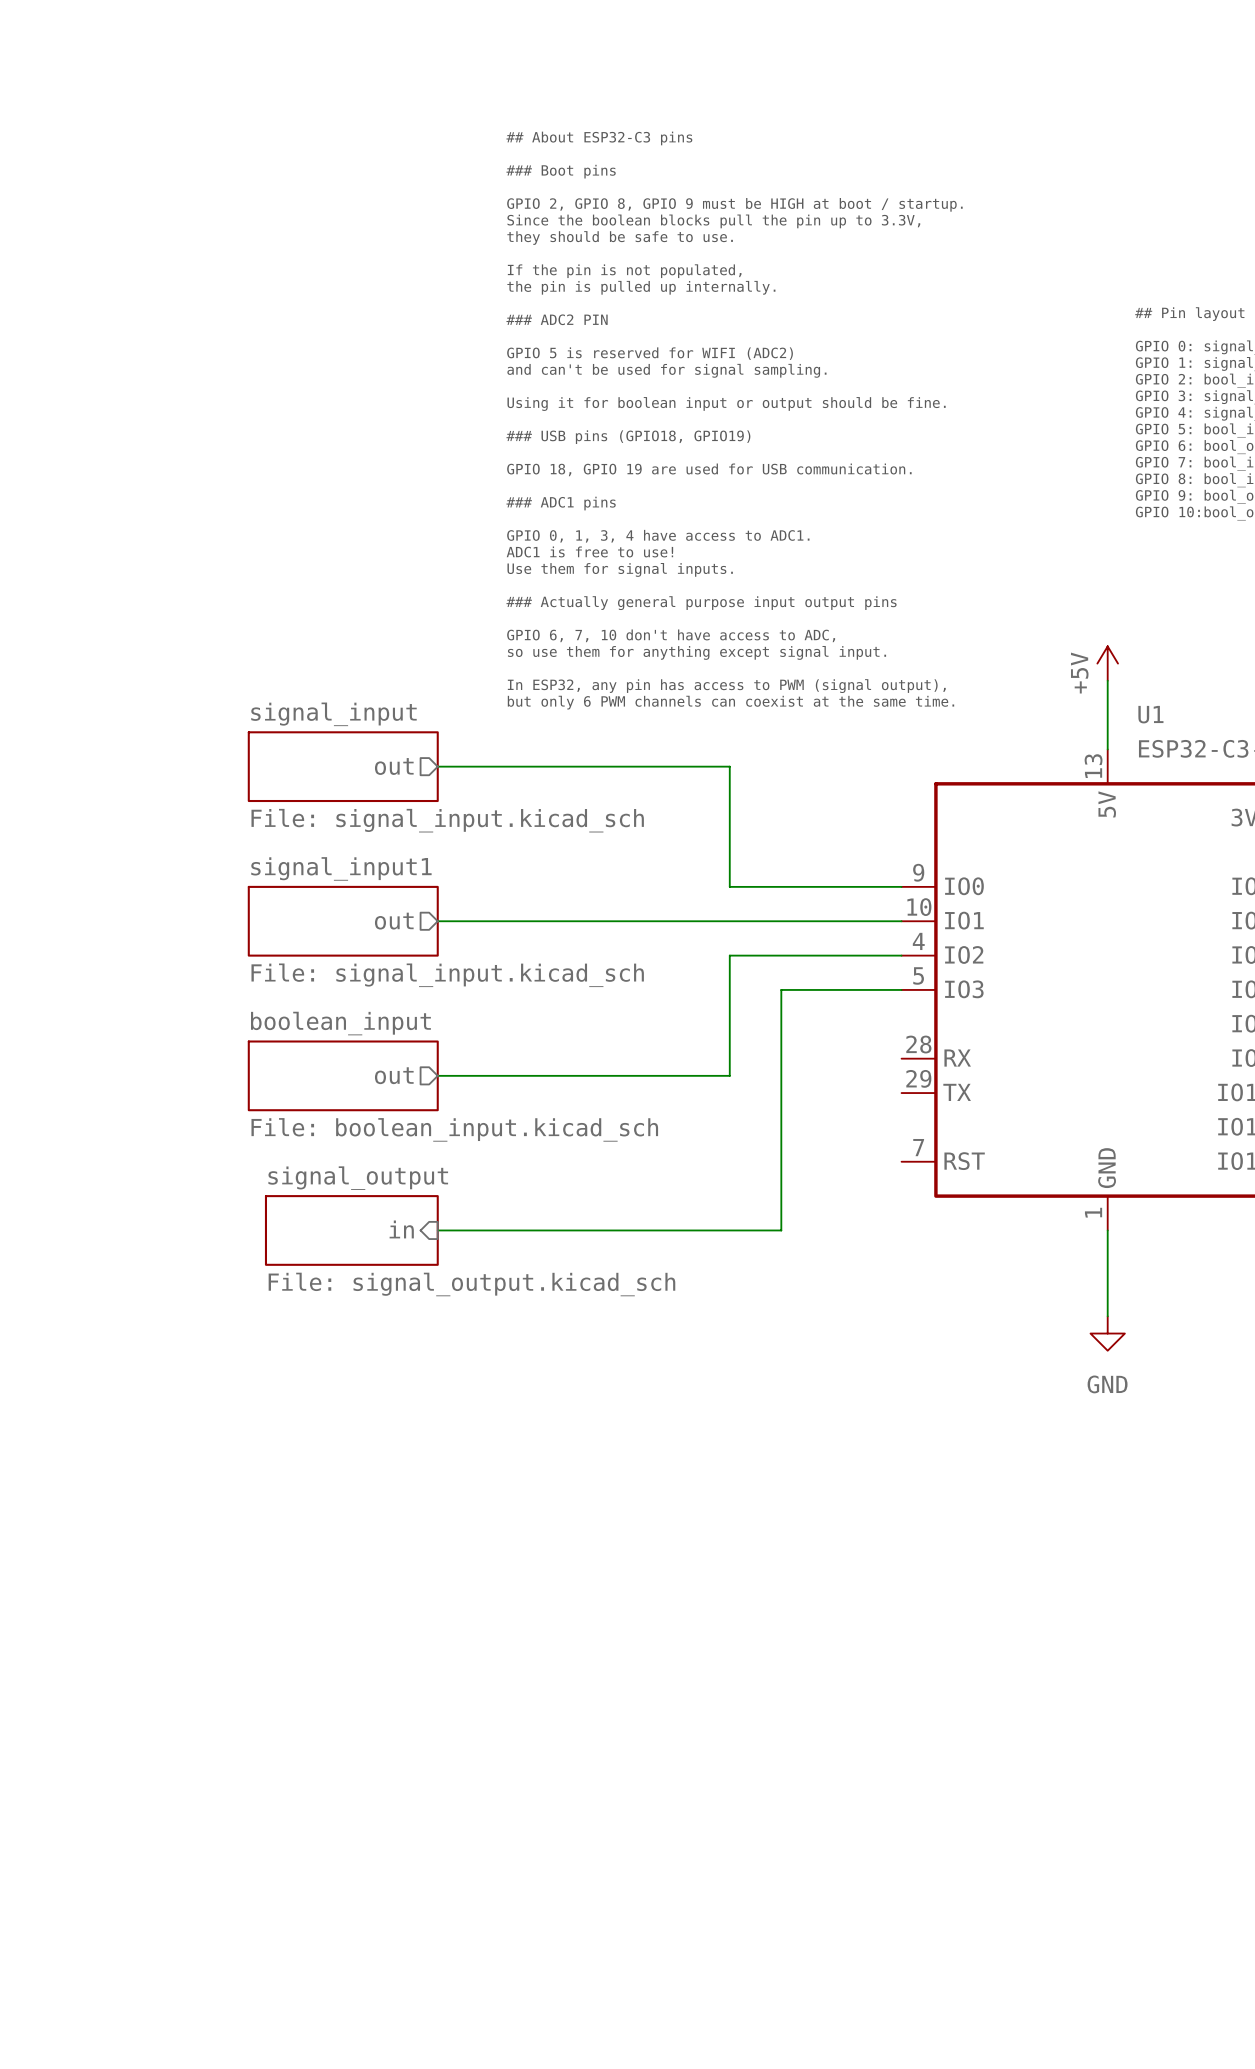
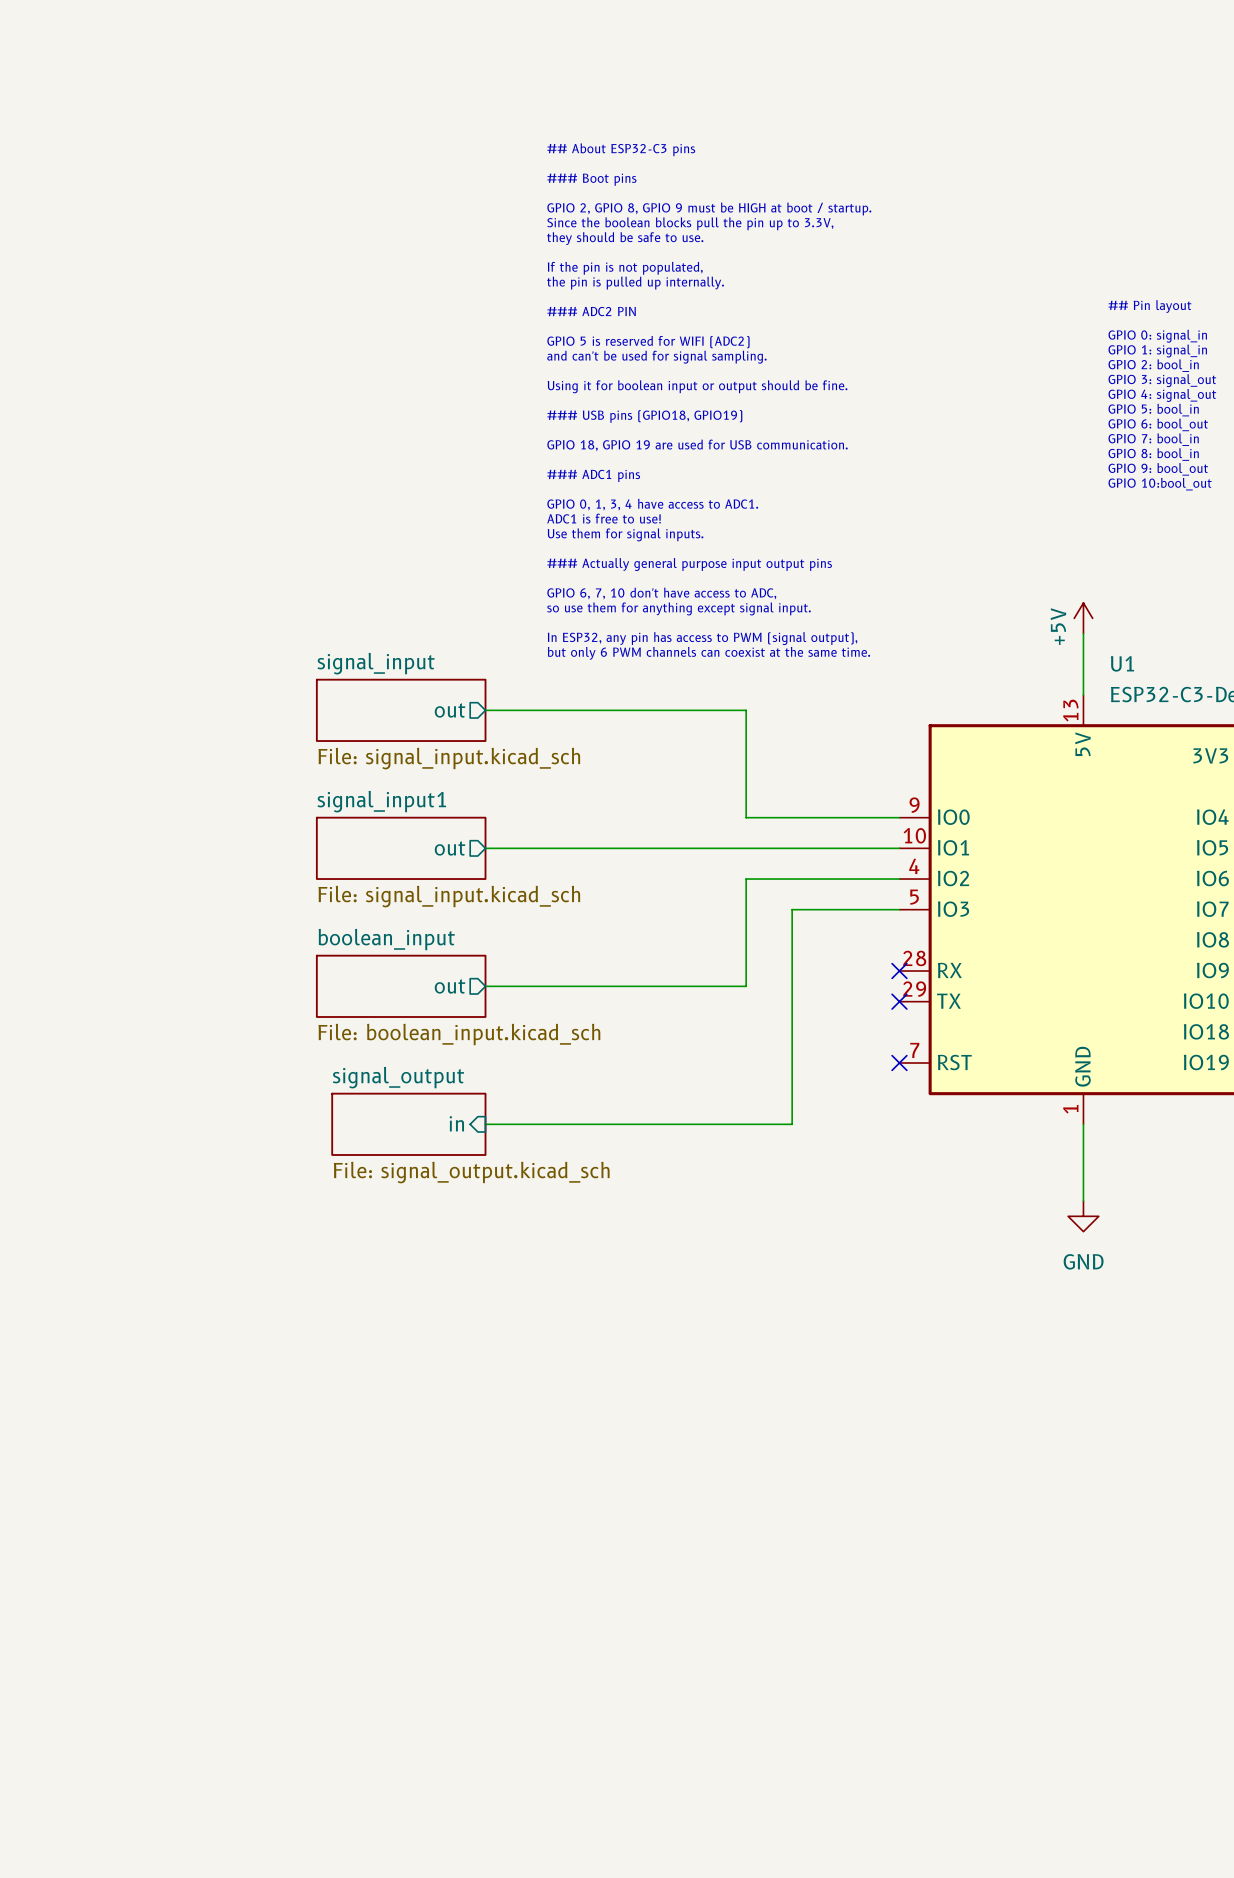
no-connect mark: none -> (899, 971)
no-connect mark: none -> (899, 1001)
no-connect mark: none -> (899, 1062)

